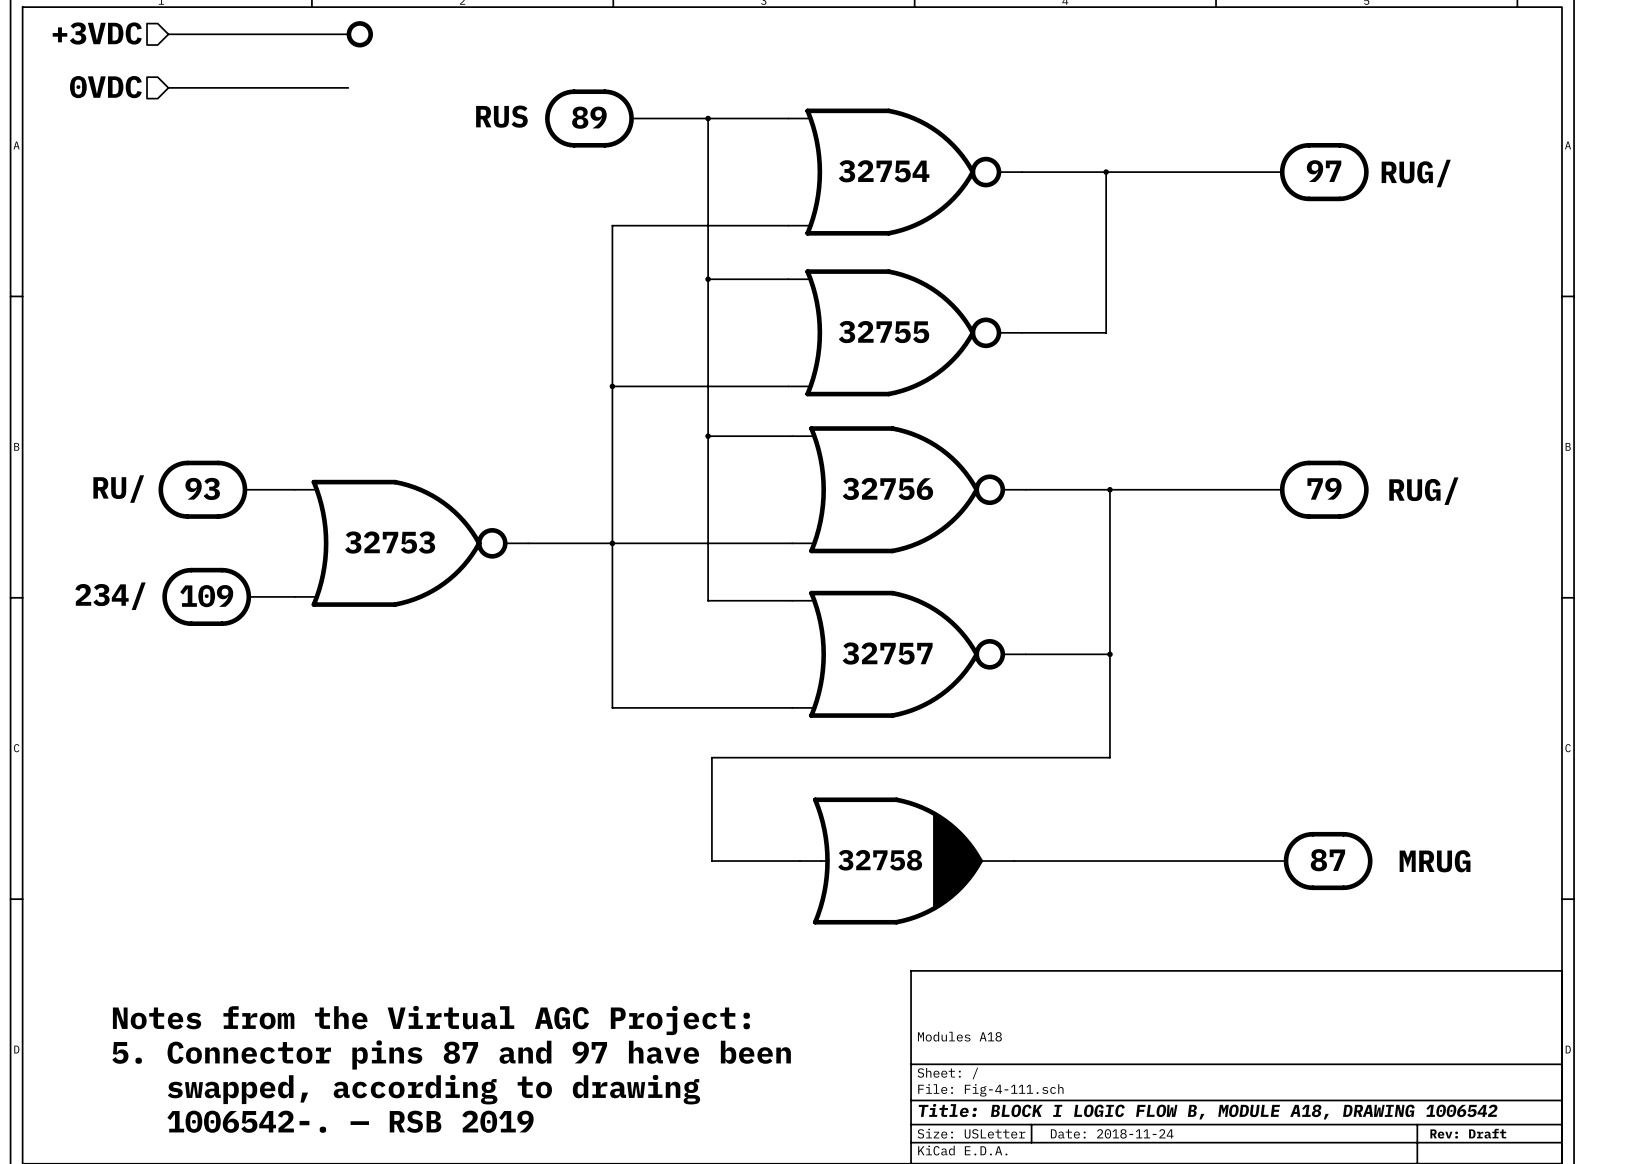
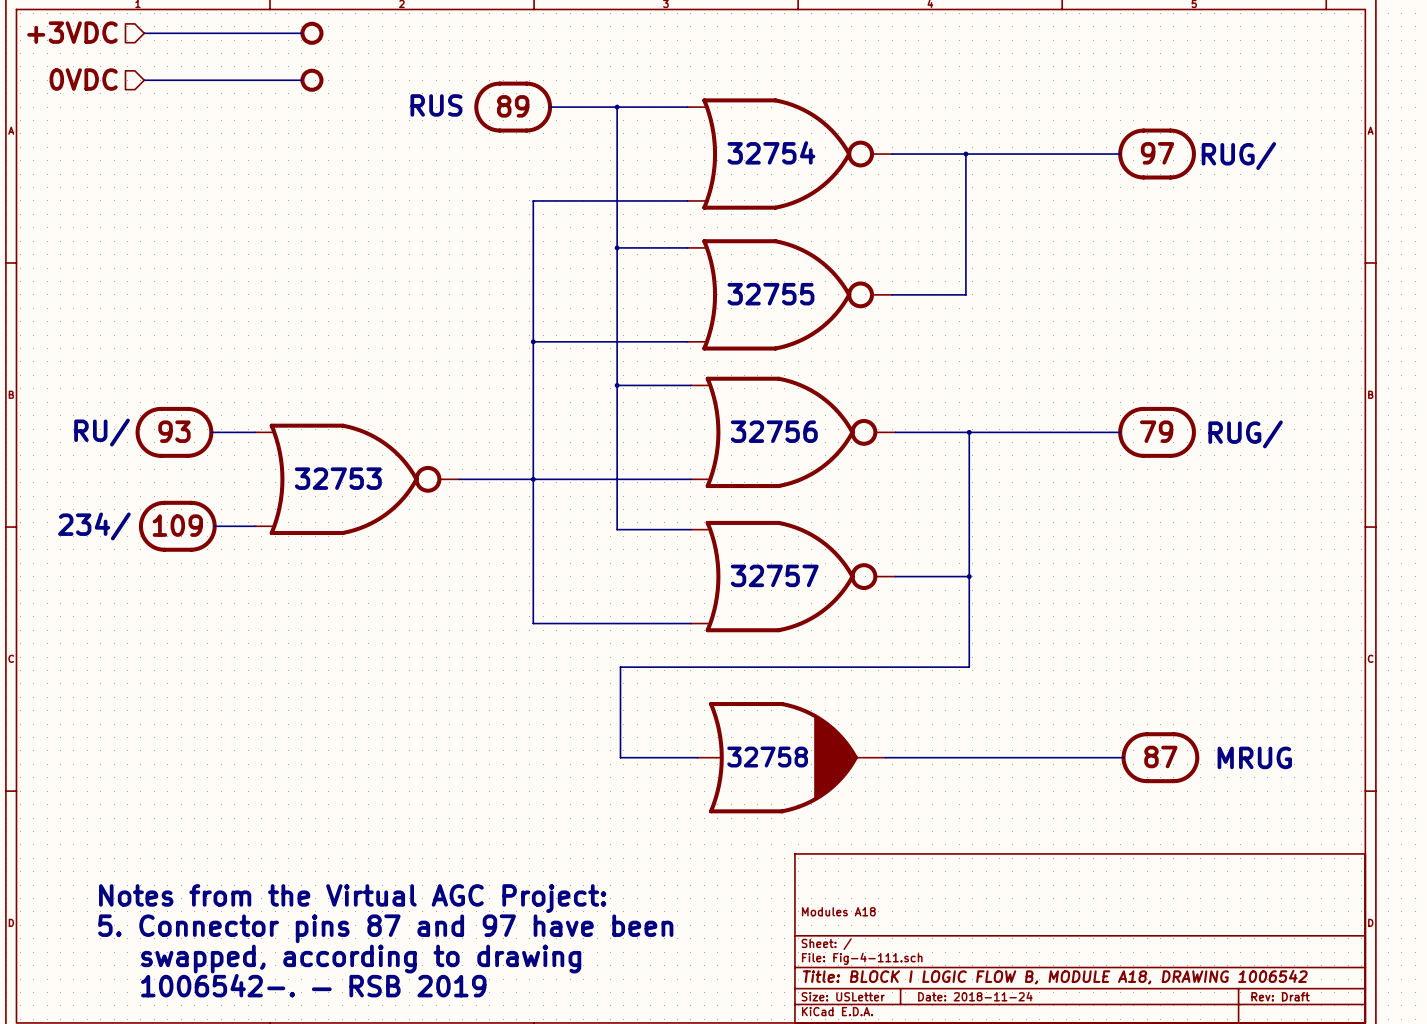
part: none -> (311, 80)

